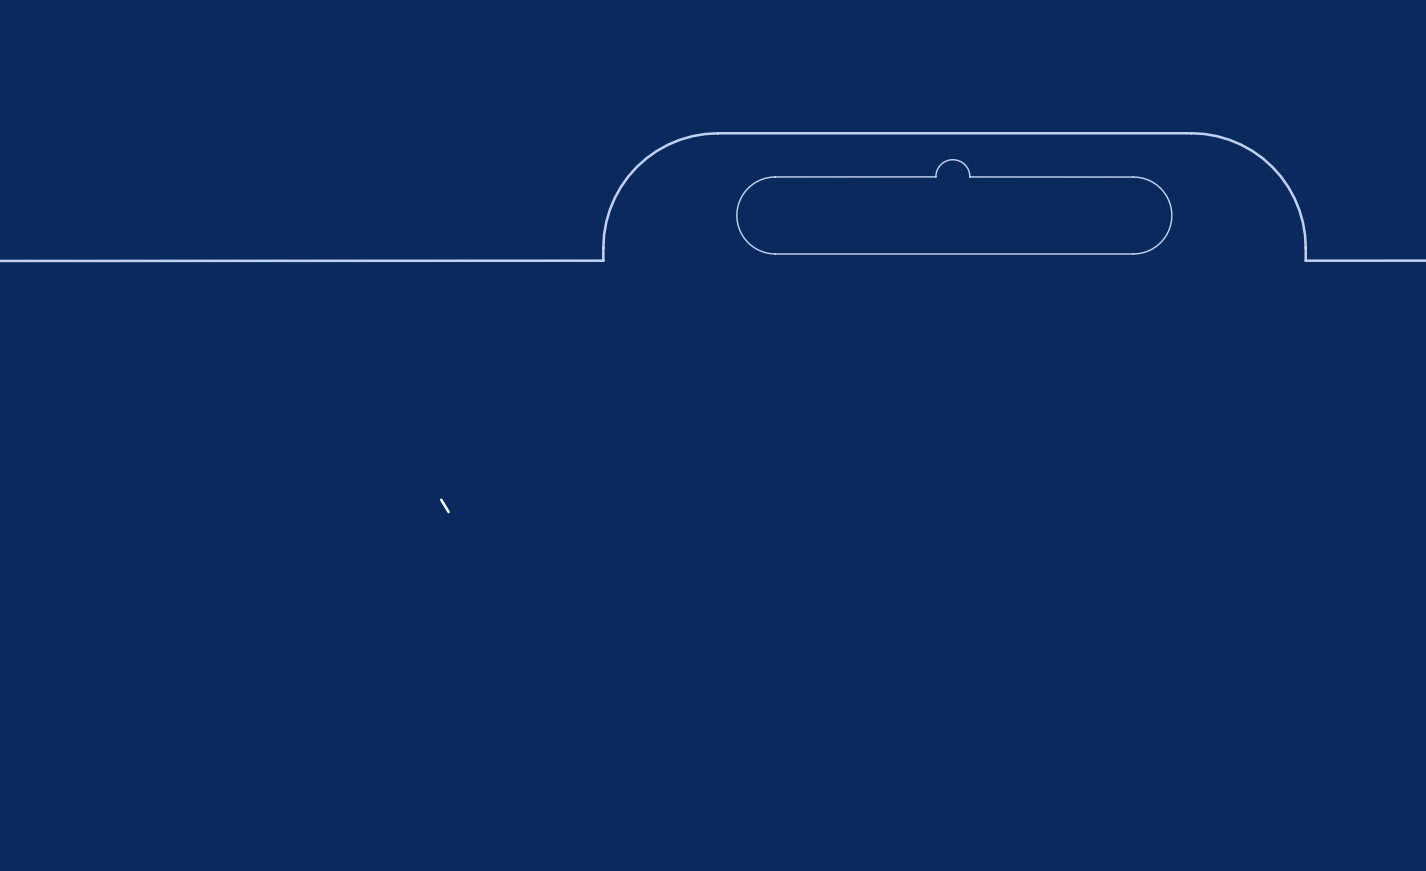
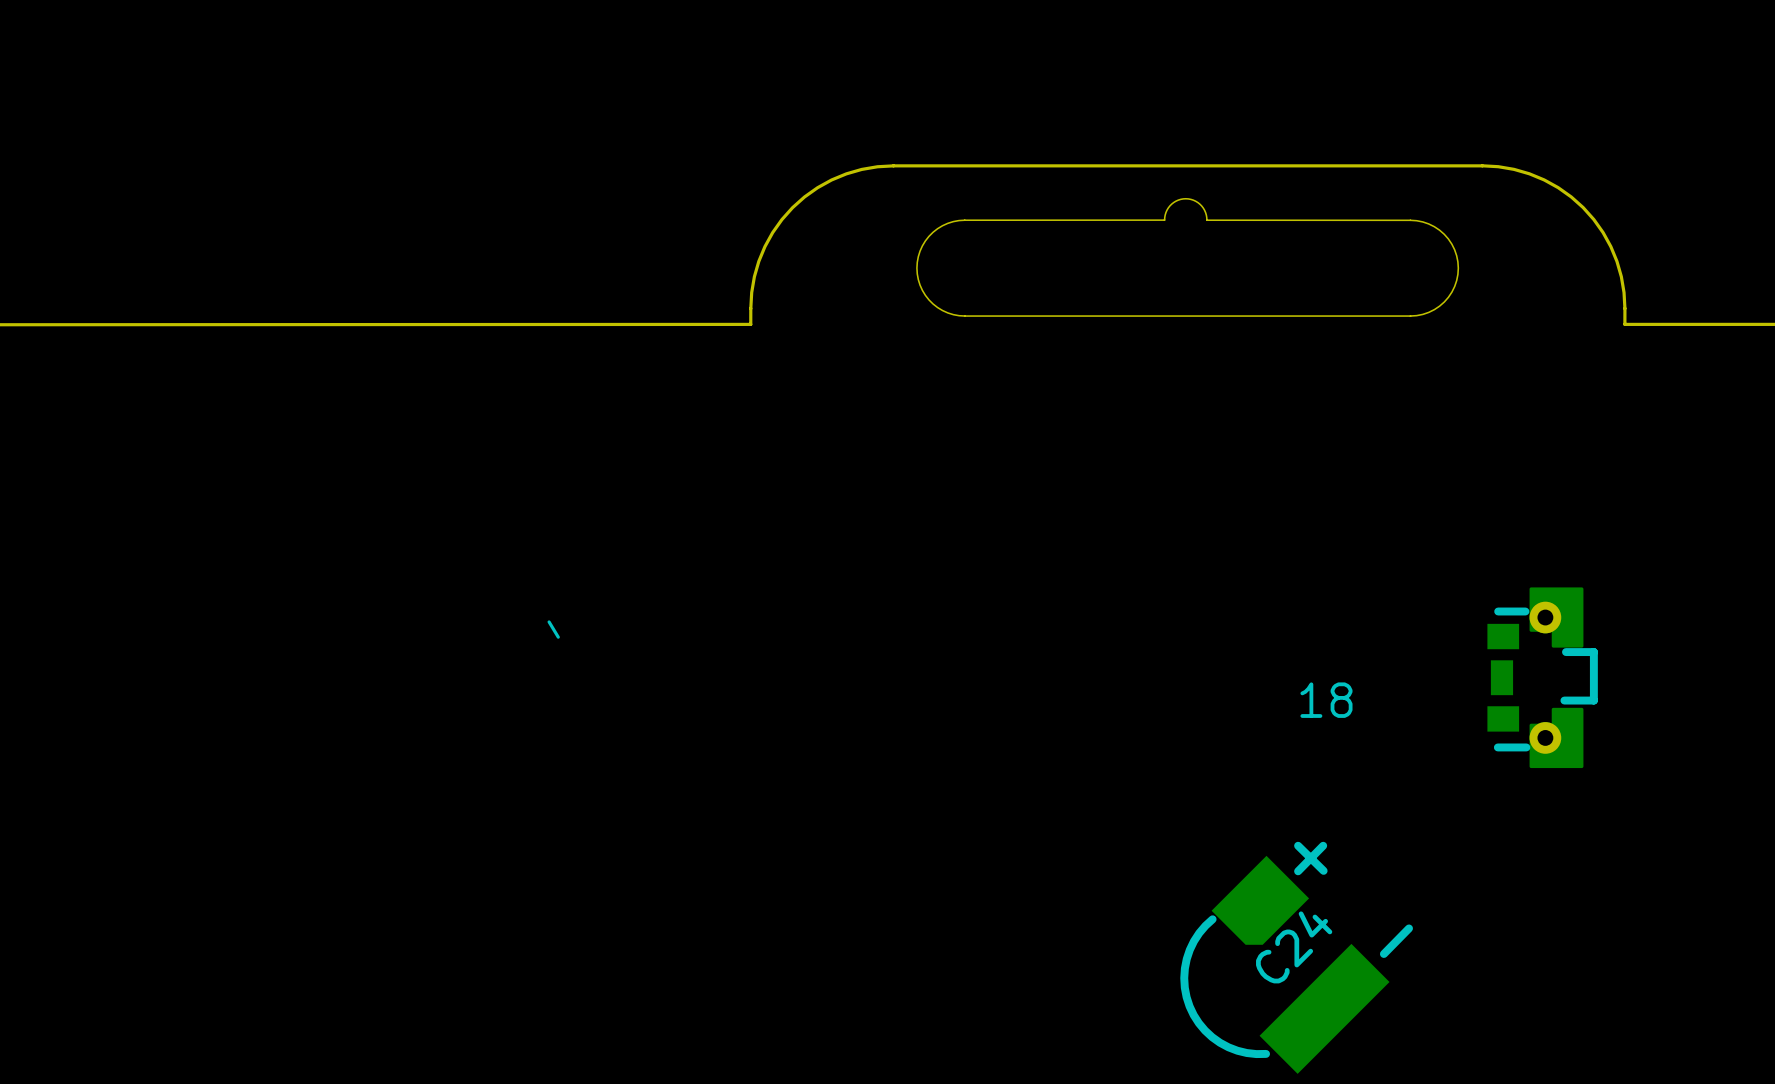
part: none -> (1542, 677)
text: none -> 18 (1326, 700)
C24: none -> (1296, 957)

